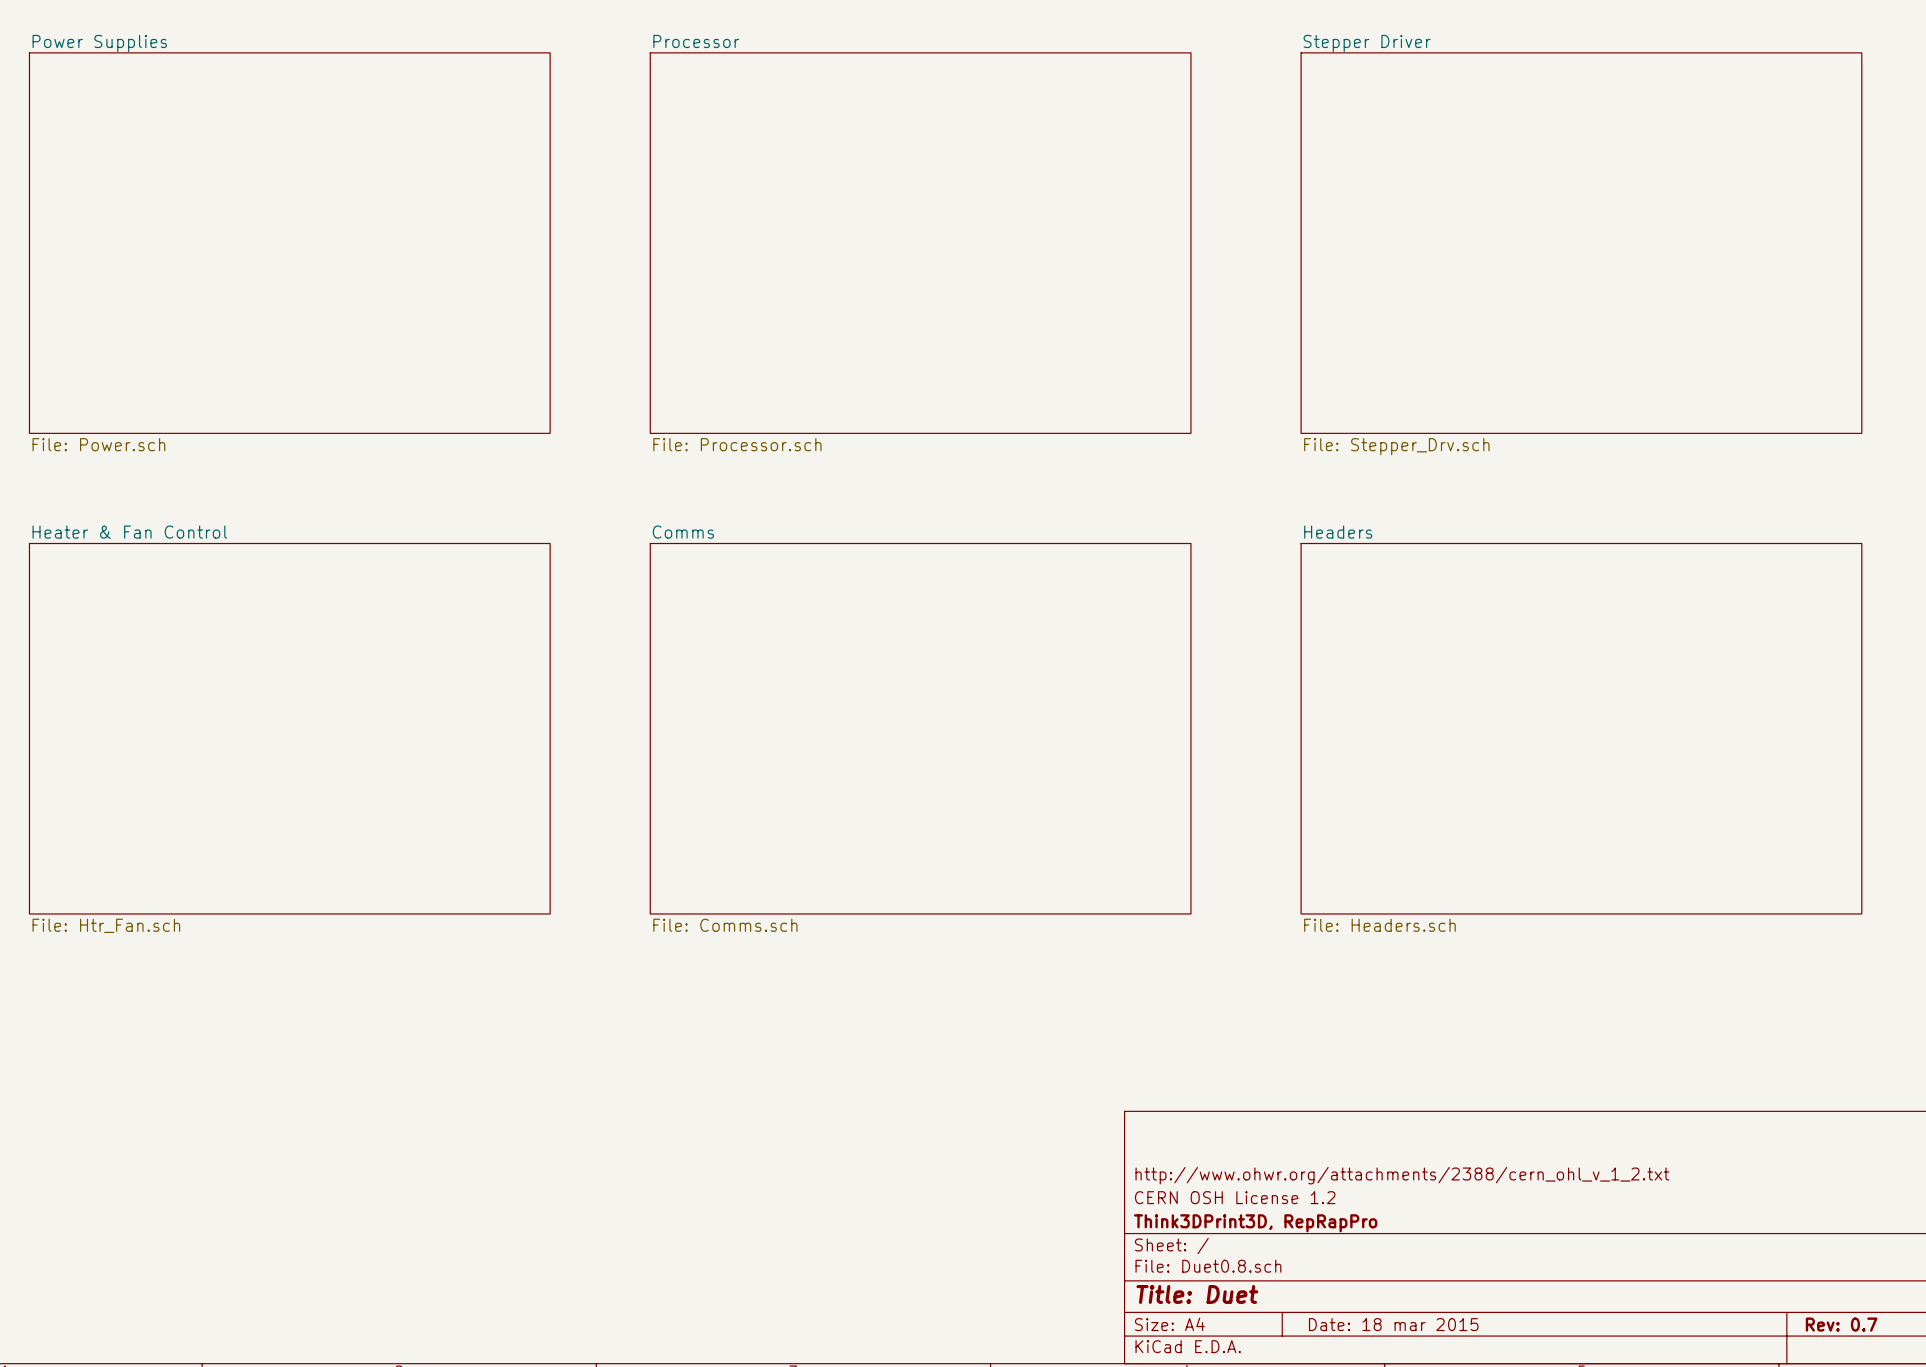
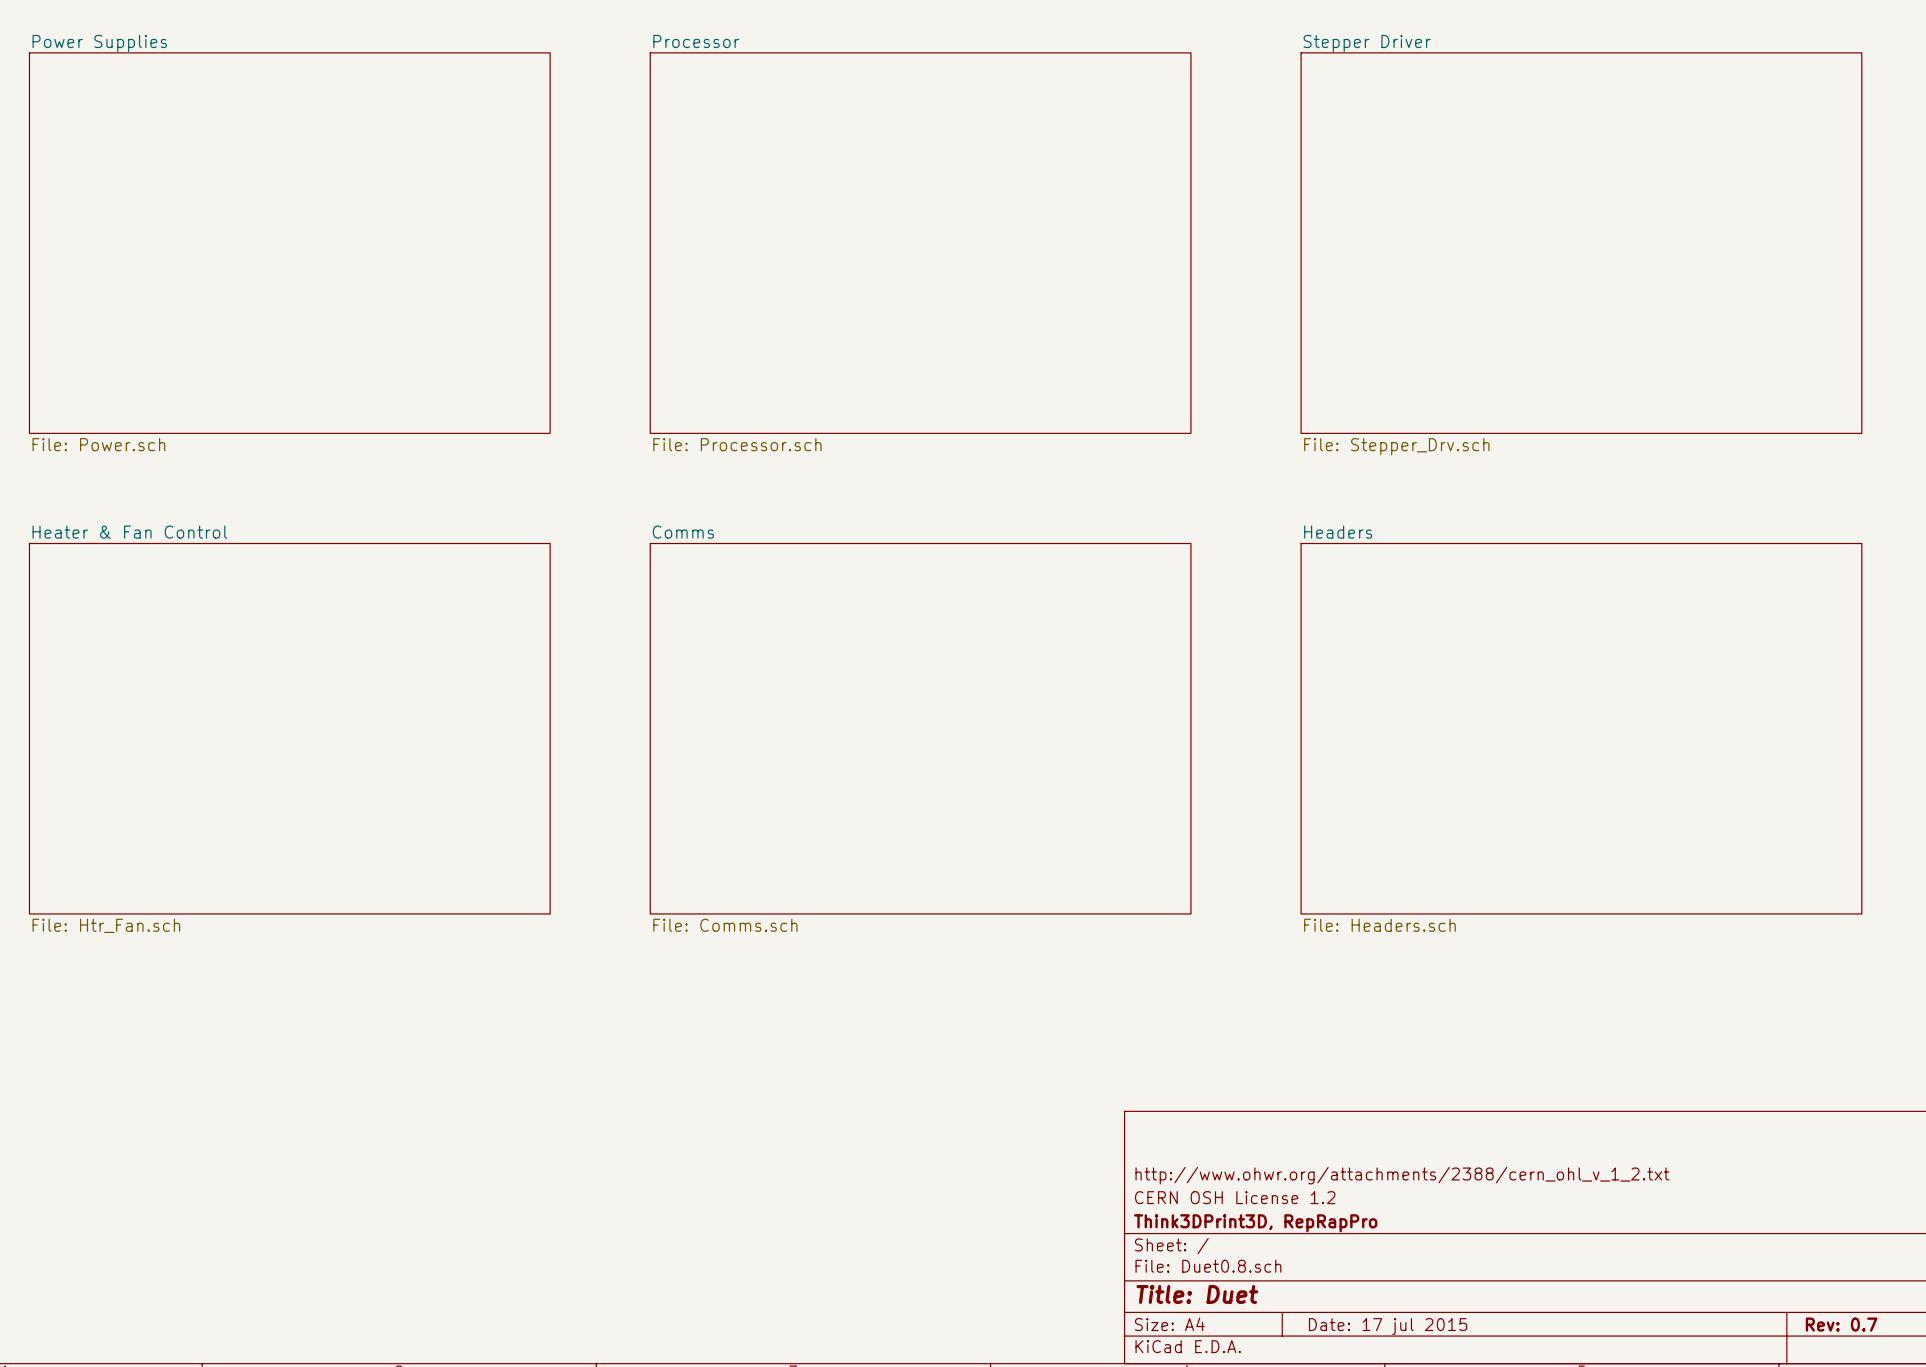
title block: Date: 18 mar 2015 (1393, 1324) -> Date: 17 jul 2015 (1388, 1326)

